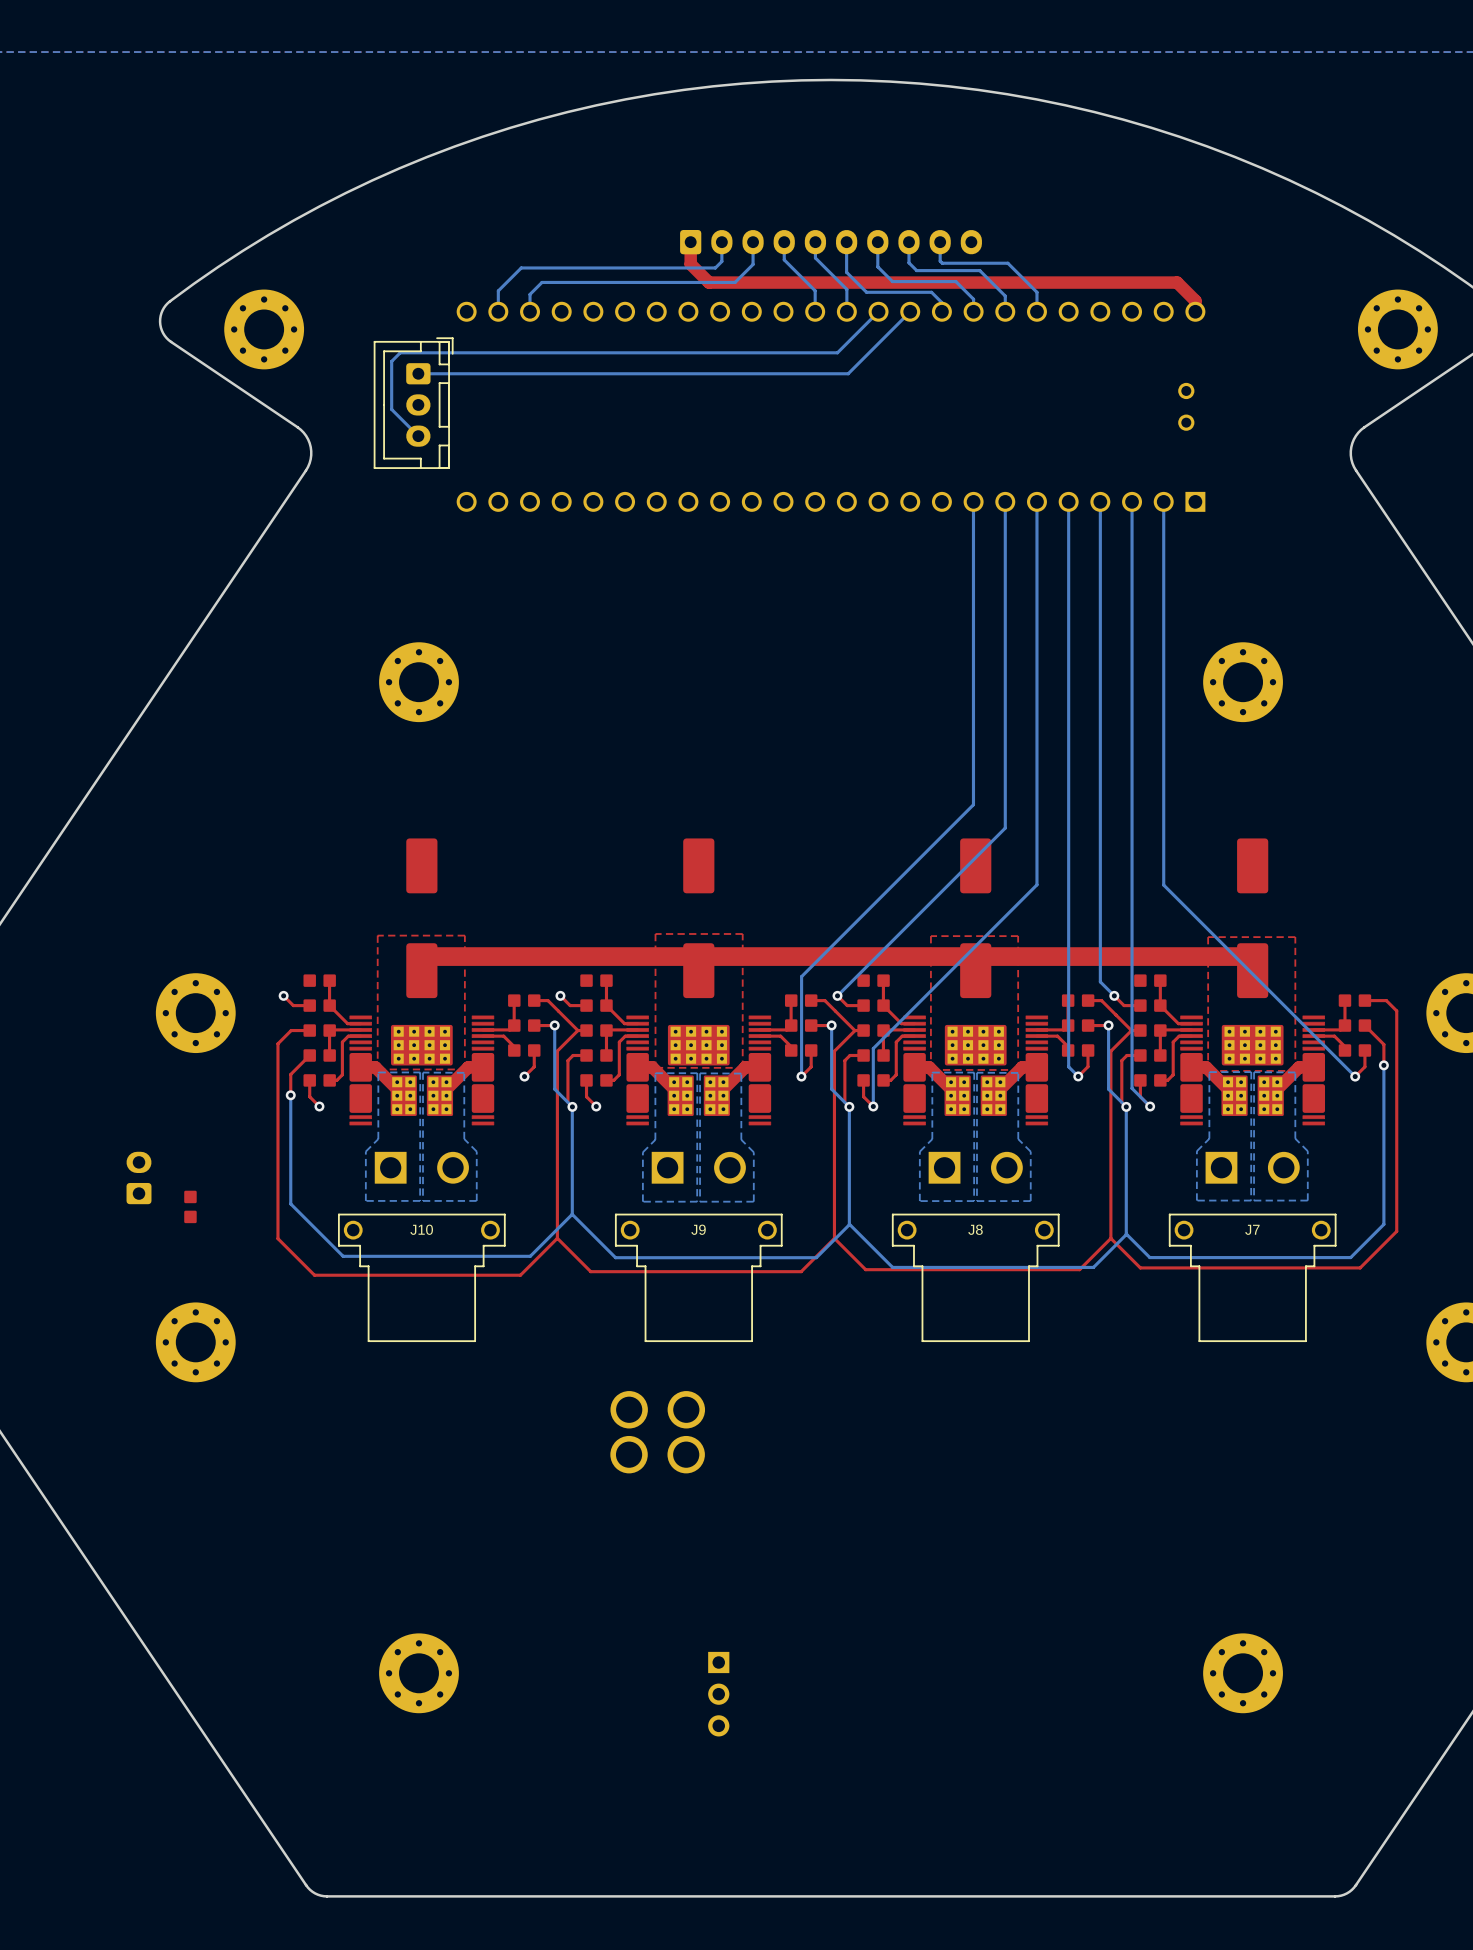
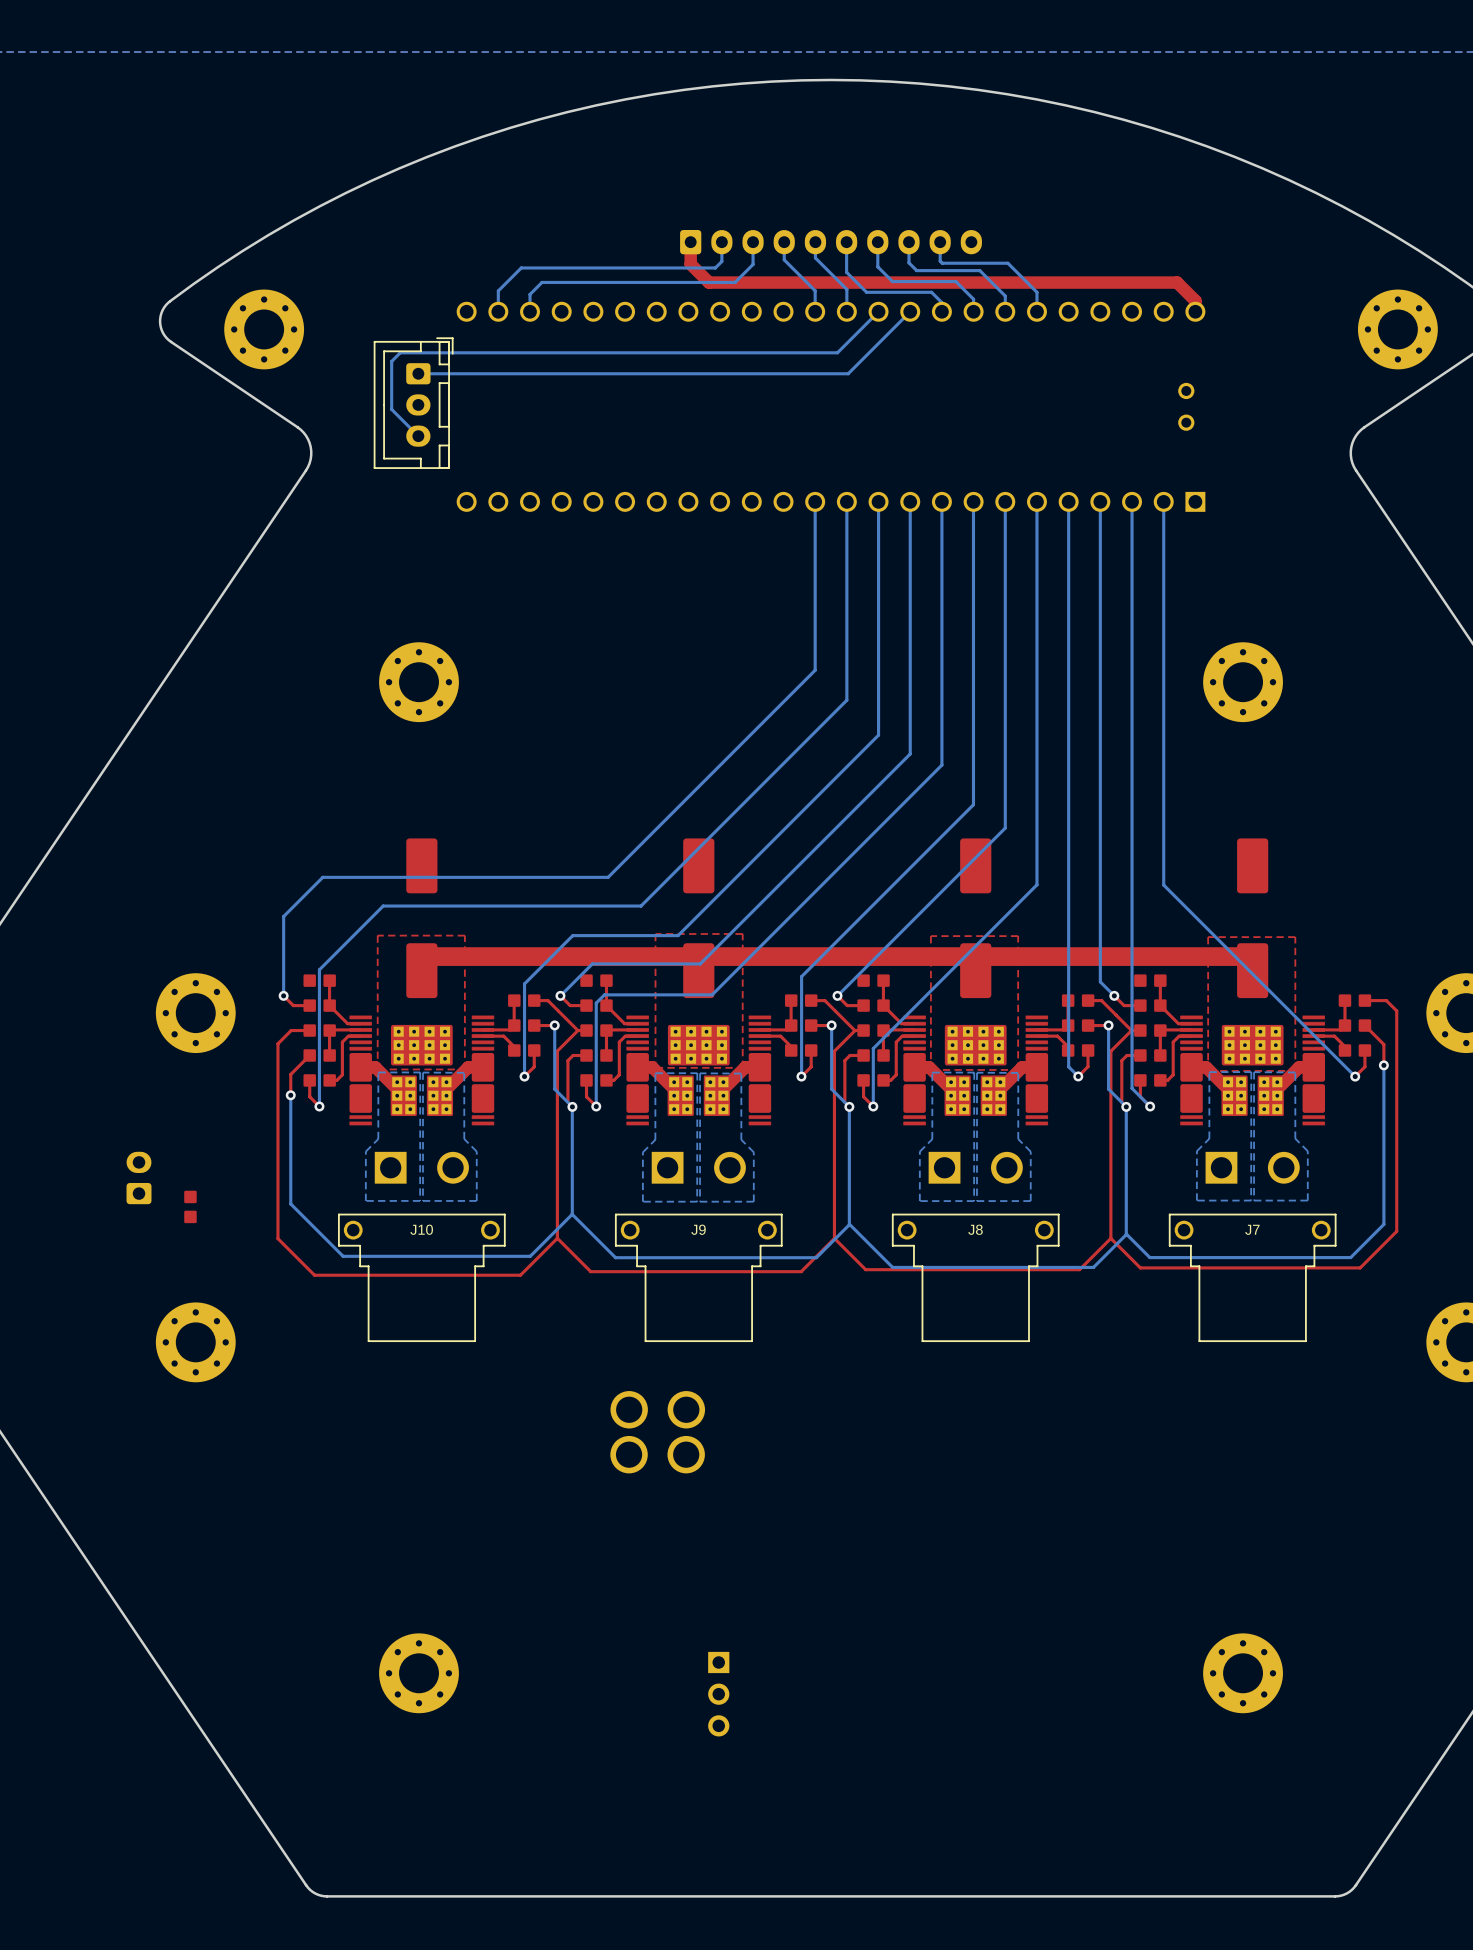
bottom track: none -> (815, 501) (815, 670) (608, 877) (322, 877) (283, 916) (283, 995)
bottom track: none -> (846, 501) (846, 700) (641, 906) (383, 906) (319, 969) (319, 1106)
bottom track: none -> (878, 501) (878, 735) (678, 935) (572, 935) (524, 983) (524, 1076)
bottom track: none -> (910, 501) (910, 753) (700, 963) (592, 963) (560, 995)
bottom track: none -> (941, 501) (941, 765) (712, 994) (604, 994) (596, 1003) (596, 1106)

